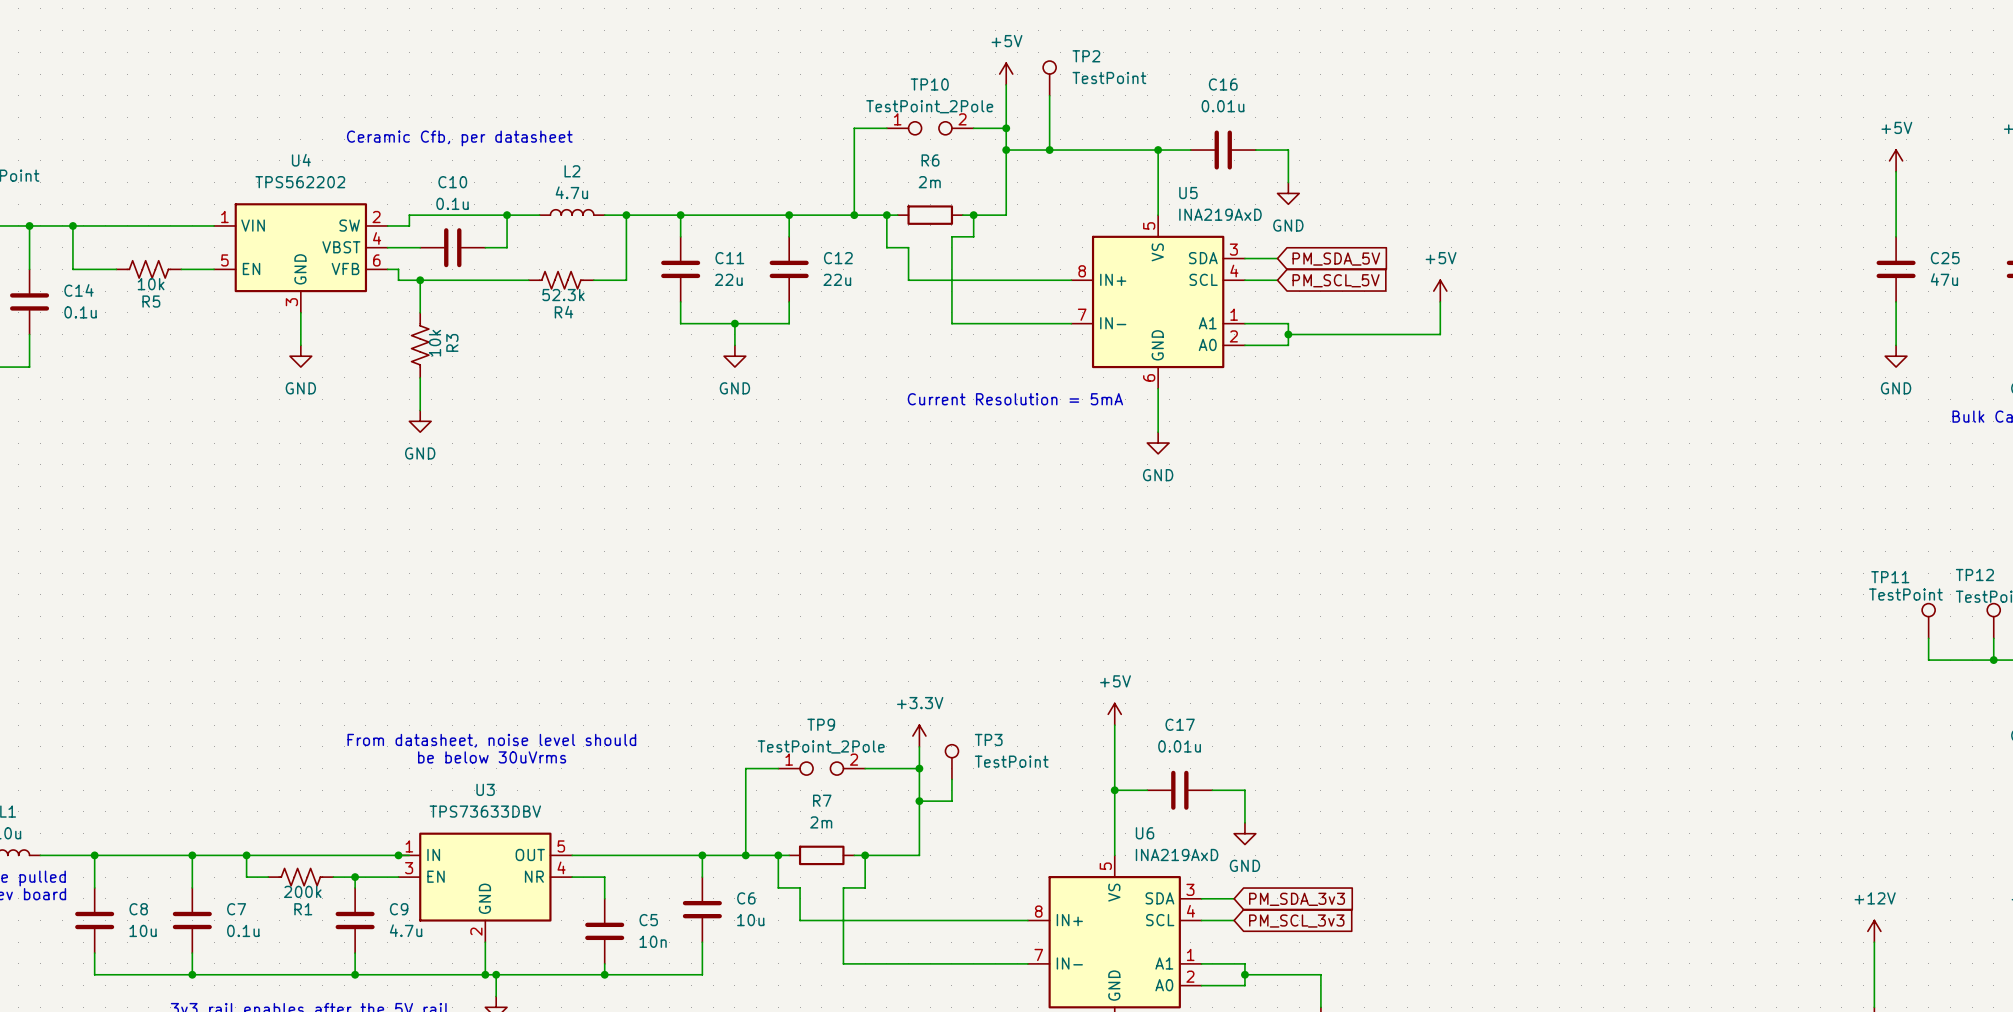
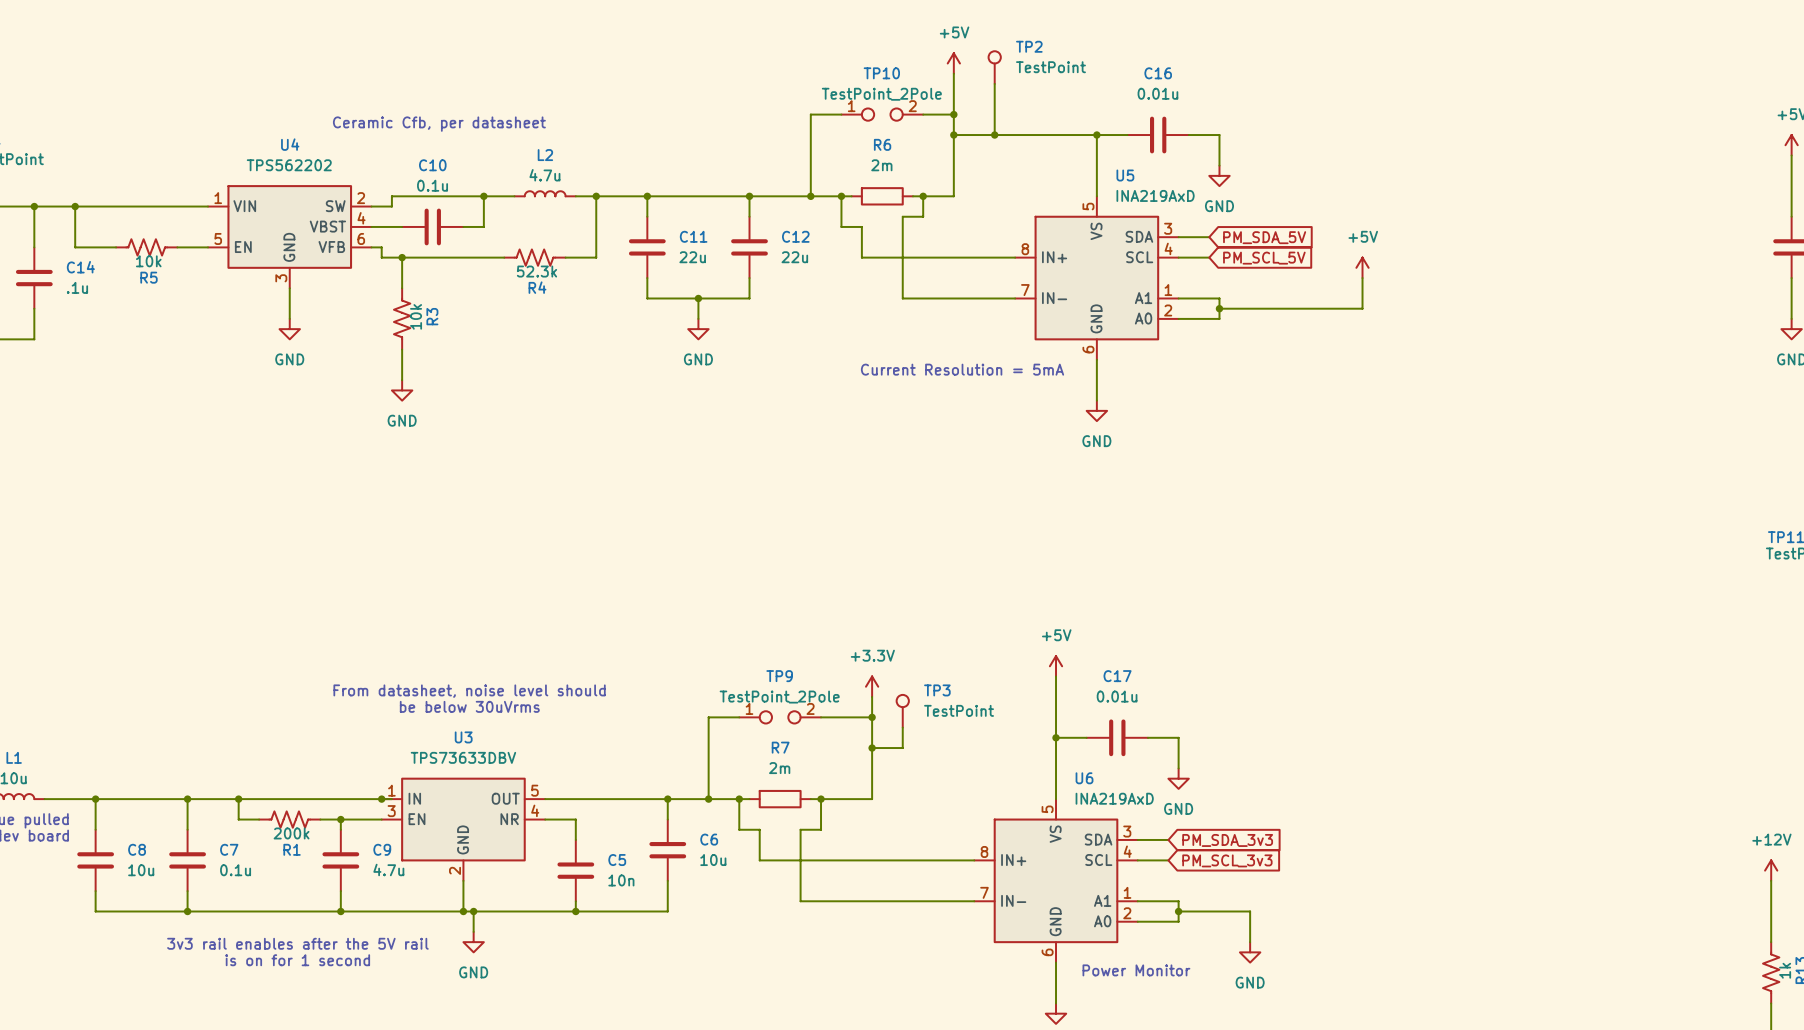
C14 value: 0.1u (80, 312) -> .1u (77, 287)

